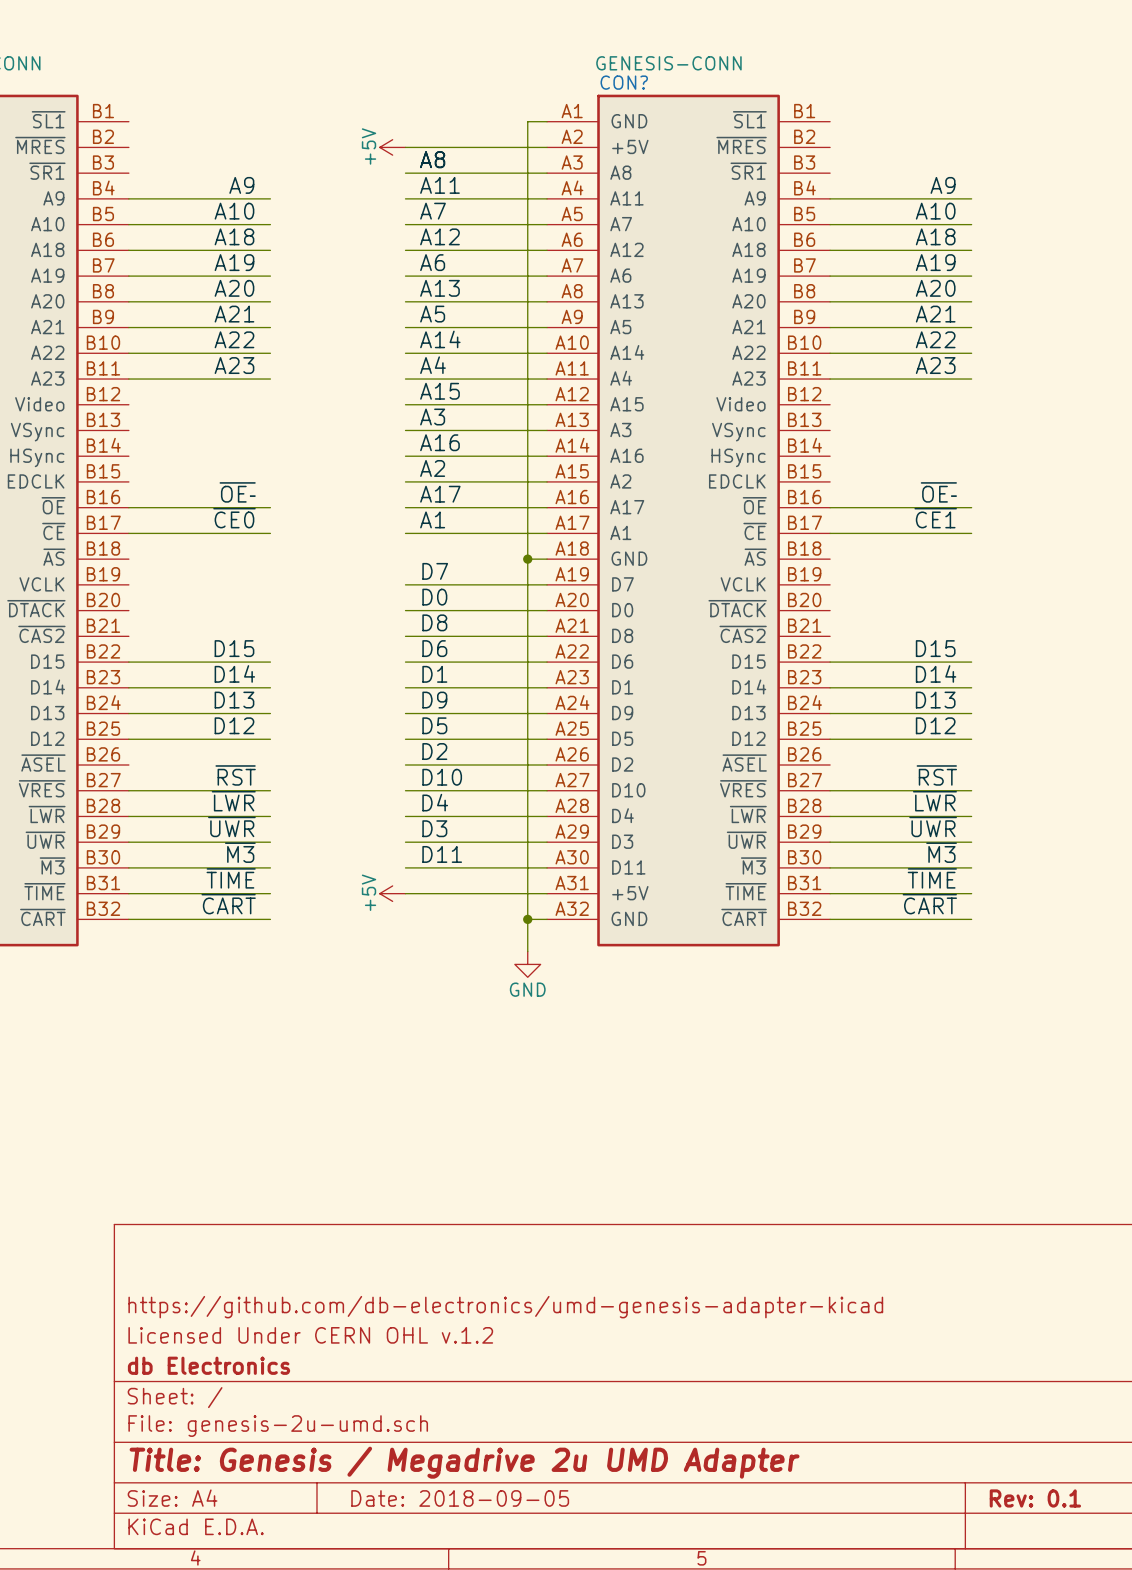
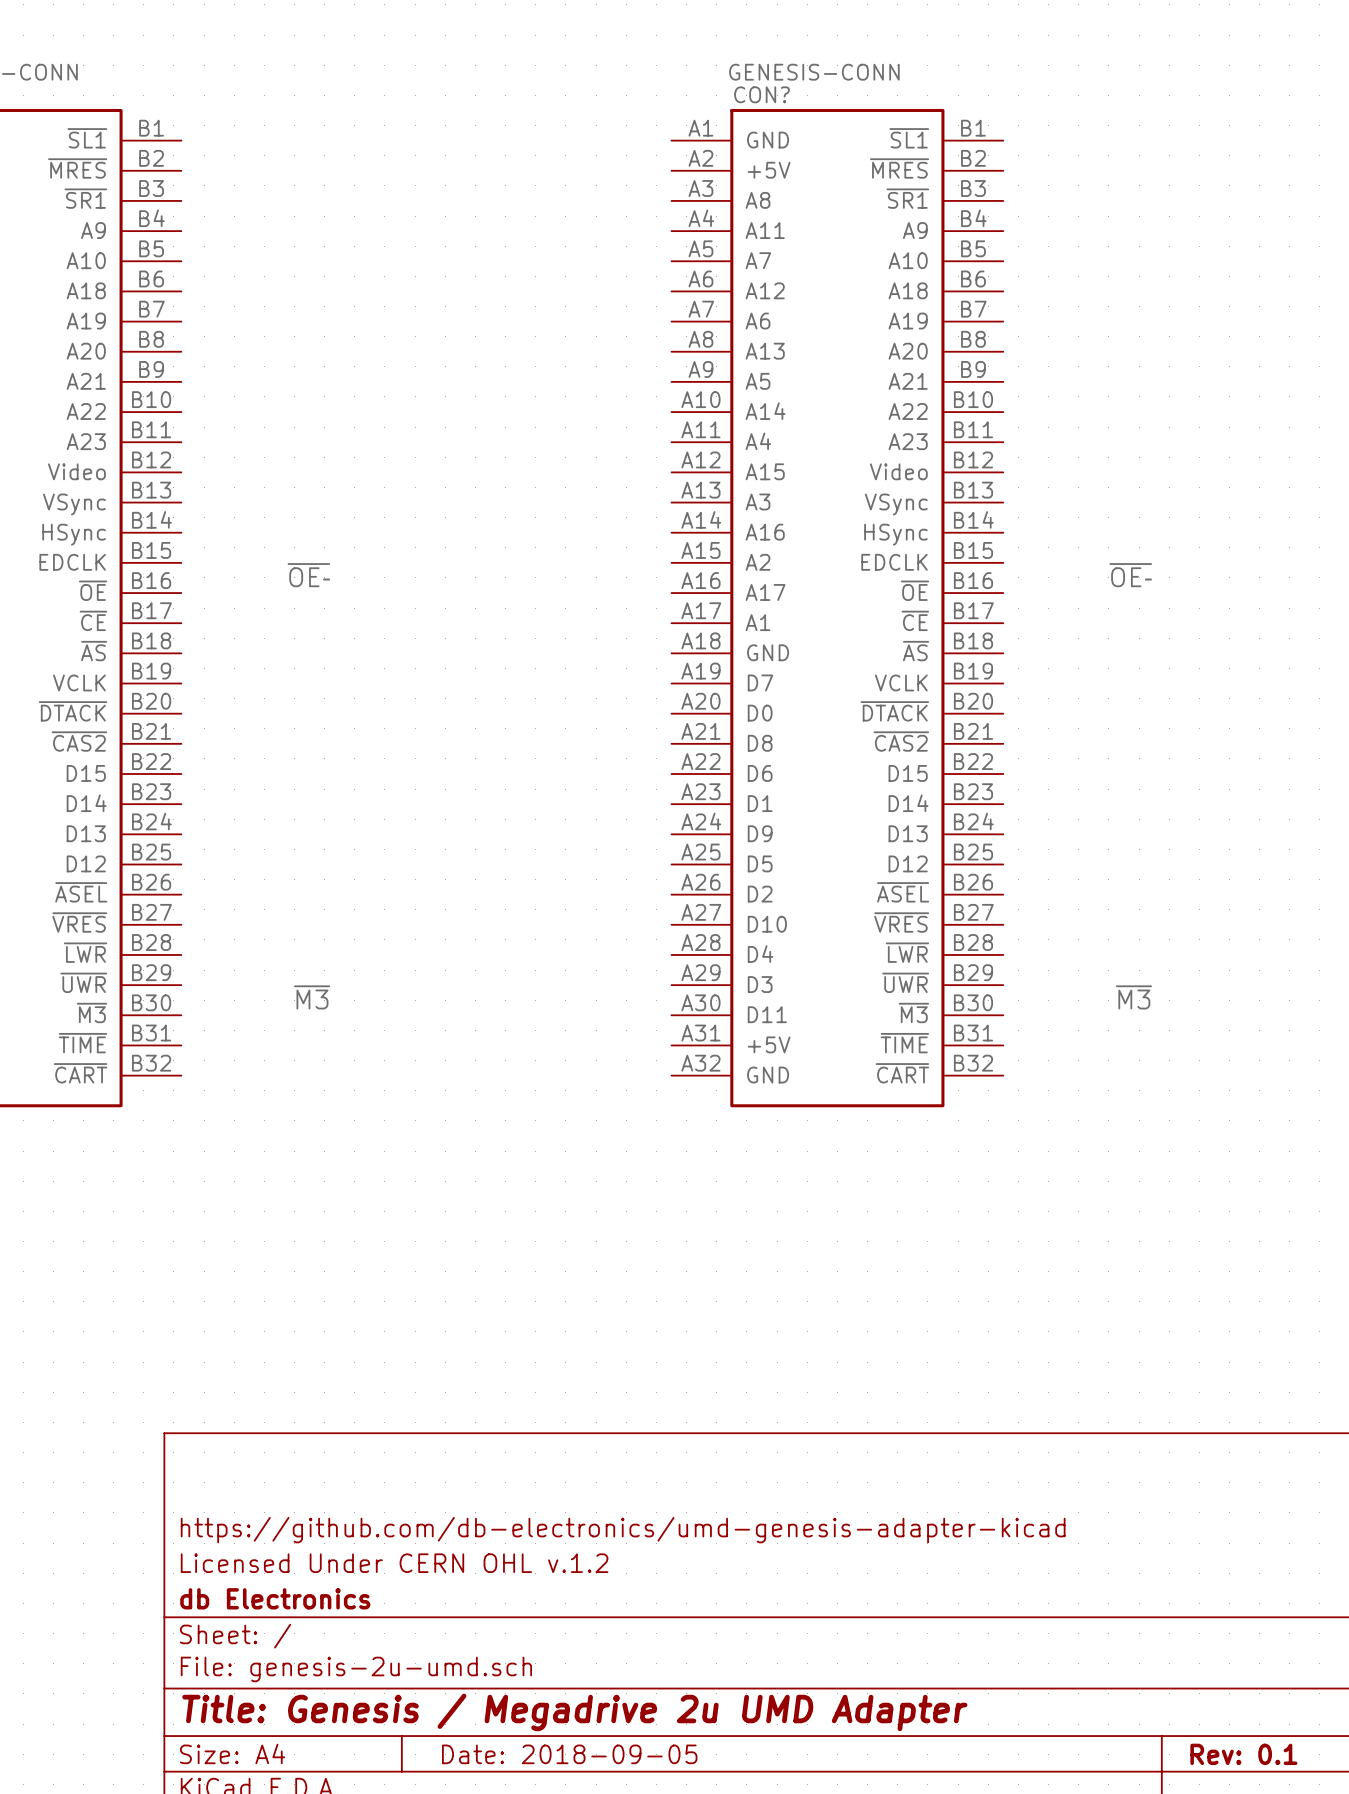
wire: (547, 121) (527, 121) (527, 951) -> none
power symbol: +5V (392, 147) -> none
wire: (405, 147) (547, 147) -> none
label: A8 (432, 159) -> none
wire: (405, 173) (547, 173) -> none
label: A9 (241, 185) -> none
label: A11 (439, 185) -> none
label: A9 (943, 185) -> none
wire: (128, 198) (270, 198) -> none
wire: (405, 198) (547, 198) -> none
wire: (830, 198) (971, 198) -> none
label: A10 (234, 211) -> none
label: A7 (432, 211) -> none
label: A10 (935, 211) -> none
wire: (128, 224) (270, 224) -> none
wire: (405, 224) (547, 224) -> none
wire: (830, 224) (971, 224) -> none
label: A18 (234, 236) -> none
label: A12 (439, 236) -> none
label: A18 (935, 236) -> none
wire: (128, 250) (270, 250) -> none
wire: (405, 250) (547, 250) -> none
wire: (830, 250) (971, 250) -> none
label: A19 (234, 262) -> none
label: A6 (432, 262) -> none
label: A19 (935, 262) -> none
wire: (128, 276) (270, 276) -> none
wire: (405, 276) (547, 276) -> none
wire: (830, 276) (971, 276) -> none
label: A20 (234, 288) -> none
label: A13 (439, 288) -> none
label: A20 (935, 288) -> none
wire: (128, 301) (270, 301) -> none
wire: (405, 301) (547, 301) -> none
wire: (830, 301) (971, 301) -> none
label: A21 (234, 314) -> none
label: A5 (432, 314) -> none
label: A21 (935, 314) -> none
wire: (128, 327) (270, 327) -> none
wire: (405, 327) (547, 327) -> none
wire: (830, 327) (971, 327) -> none
label: A22 (234, 339) -> none
label: A14 (440, 339) -> none
label: A22 (935, 339) -> none
wire: (128, 353) (270, 353) -> none
wire: (405, 353) (547, 353) -> none
wire: (830, 353) (971, 353) -> none
label: A23 (234, 365) -> none
label: A4 (432, 365) -> none
label: A23 (935, 365) -> none
wire: (128, 379) (270, 379) -> none
wire: (405, 379) (547, 379) -> none
wire: (830, 379) (971, 379) -> none
label: A15 (439, 391) -> none
wire: (405, 404) (547, 404) -> none
label: A3 (432, 417) -> none
wire: (405, 430) (547, 430) -> none
label: A16 (439, 442) -> none
wire: (405, 456) (547, 456) -> none
label: A2 (432, 468) -> none
wire: (405, 481) (547, 481) -> none
label: A17 (440, 494) -> none
wire: (128, 507) (270, 507) -> none
wire: (405, 507) (547, 507) -> none
wire: (830, 507) (971, 507) -> none
label: ~{CE0} (234, 518) -> none
label: ~{CE1} (935, 518) -> none
label: A1 (432, 519) -> none
wire: (128, 533) (270, 533) -> none
wire: (405, 533) (547, 533) -> none
wire: (830, 533) (971, 533) -> none
wire: (527, 559) (547, 559) -> none
junction: (527, 559) -> none
label: D7 (435, 571) -> none
wire: (405, 584) (547, 584) -> none
label: D0 (434, 597) -> none
wire: (405, 610) (547, 610) -> none
label: D8 (434, 622) -> none
wire: (405, 636) (547, 636) -> none
label: D15 (234, 648) -> none
label: D6 (434, 648) -> none
label: D15 (935, 648) -> none
wire: (128, 662) (270, 662) -> none
wire: (405, 662) (547, 662) -> none
wire: (830, 662) (971, 662) -> none
label: D14 (234, 673) -> none
label: D14 (936, 673) -> none
label: D1 (434, 674) -> none
wire: (128, 687) (270, 687) -> none
wire: (405, 687) (547, 687) -> none
wire: (830, 687) (971, 687) -> none
label: D13 (234, 700) -> none
label: D9 (434, 700) -> none
label: D13 (935, 700) -> none
wire: (128, 713) (270, 713) -> none
wire: (405, 713) (547, 713) -> none
wire: (830, 713) (971, 713) -> none
label: D12 (234, 725) -> none
label: D5 (434, 725) -> none
label: D12 (935, 725) -> none
wire: (128, 739) (270, 739) -> none
wire: (405, 739) (547, 739) -> none
wire: (830, 739) (971, 739) -> none
label: D2 (434, 751) -> none
wire: (405, 764) (547, 764) -> none
label: ~{RST} (235, 775) -> none
label: ~{RST} (936, 775) -> none
label: D10 (442, 777) -> none
wire: (128, 790) (270, 790) -> none
wire: (405, 790) (547, 790) -> none
wire: (830, 790) (971, 790) -> none
label: ~{LWR} (233, 801) -> none
label: ~{LWR} (934, 801) -> none
label: D4 (435, 802) -> none
wire: (128, 816) (270, 816) -> none
wire: (405, 816) (547, 816) -> none
wire: (830, 816) (971, 816) -> none
label: ~{UWR} (231, 826) -> none
label: ~{UWR} (933, 826) -> none
label: D3 (434, 828) -> none
wire: (128, 842) (270, 842) -> none
wire: (405, 842) (547, 842) -> none
wire: (830, 842) (971, 842) -> none
label: D11 (442, 854) -> none
wire: (128, 867) (270, 867) -> none
wire: (405, 867) (547, 867) -> none
wire: (830, 867) (971, 867) -> none
label: ~{TIME} (231, 878) -> none
label: ~{TIME} (932, 878) -> none
wire: (128, 893) (270, 893) -> none
power symbol: +5V (392, 893) -> none
wire: (405, 893) (547, 893) -> none
wire: (830, 893) (971, 893) -> none
label: ~{CART} (228, 904) -> none
label: ~{CART} (929, 904) -> none
wire: (128, 919) (270, 919) -> none
wire: (527, 919) (547, 919) -> none
junction: (527, 919) -> none
wire: (830, 919) (971, 919) -> none
power symbol: GND (527, 964) -> none

